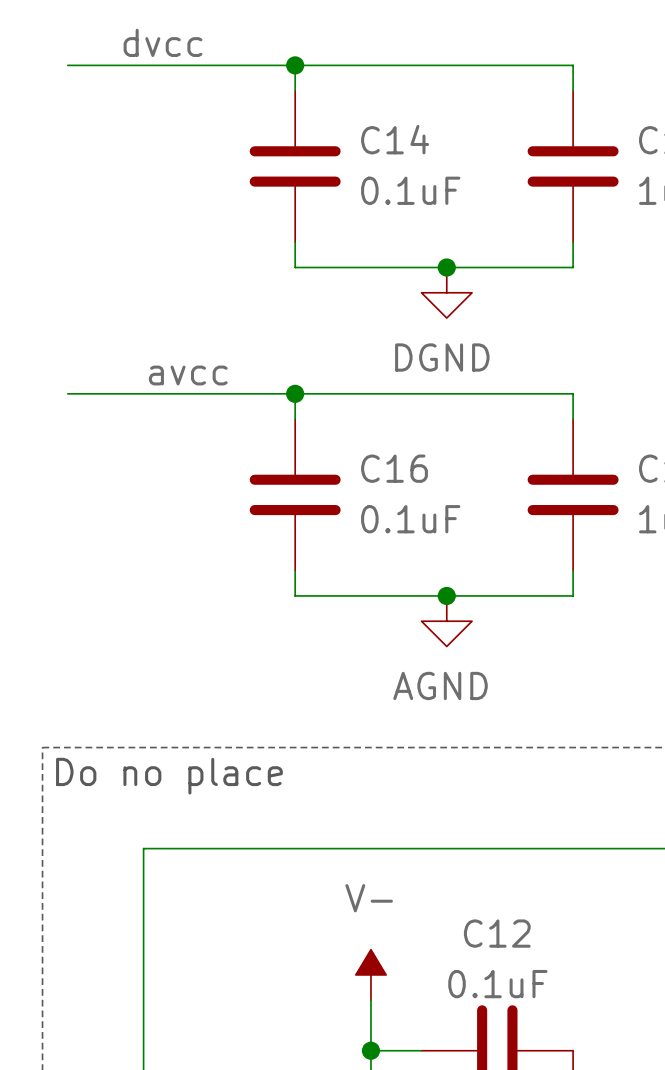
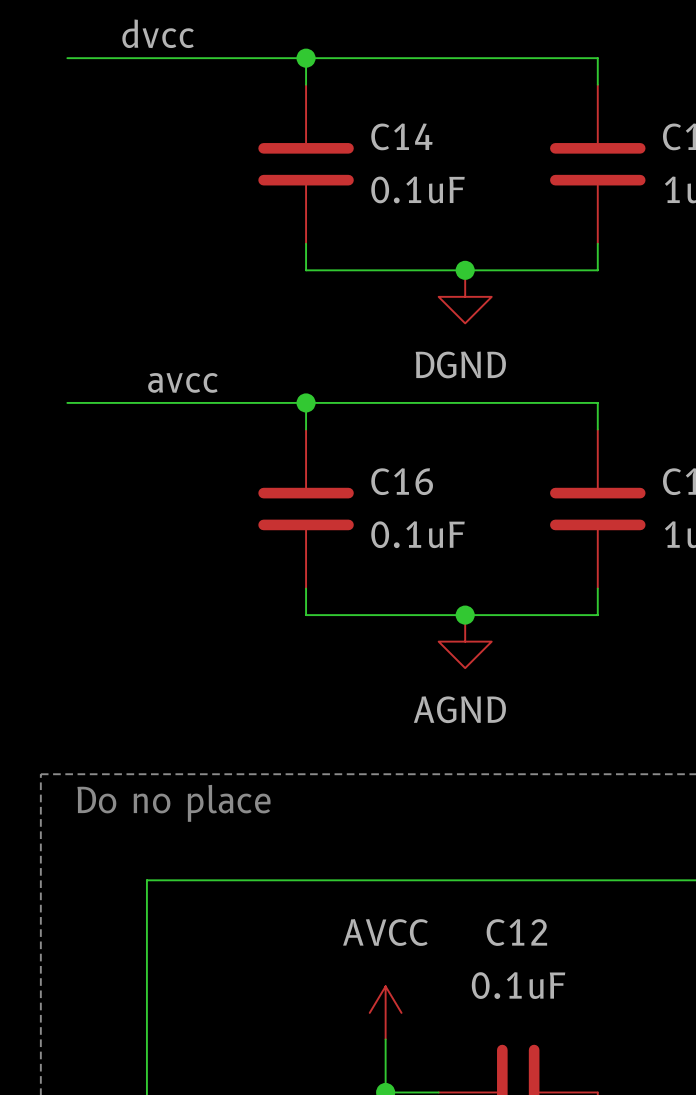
C12 name position: C12 (497, 933) -> C12 (516, 932)
power symbol: V- (370, 974) -> AVCC (385, 1012)
C12 value position: 0.1uF (497, 984) -> 0.1uF (518, 985)

